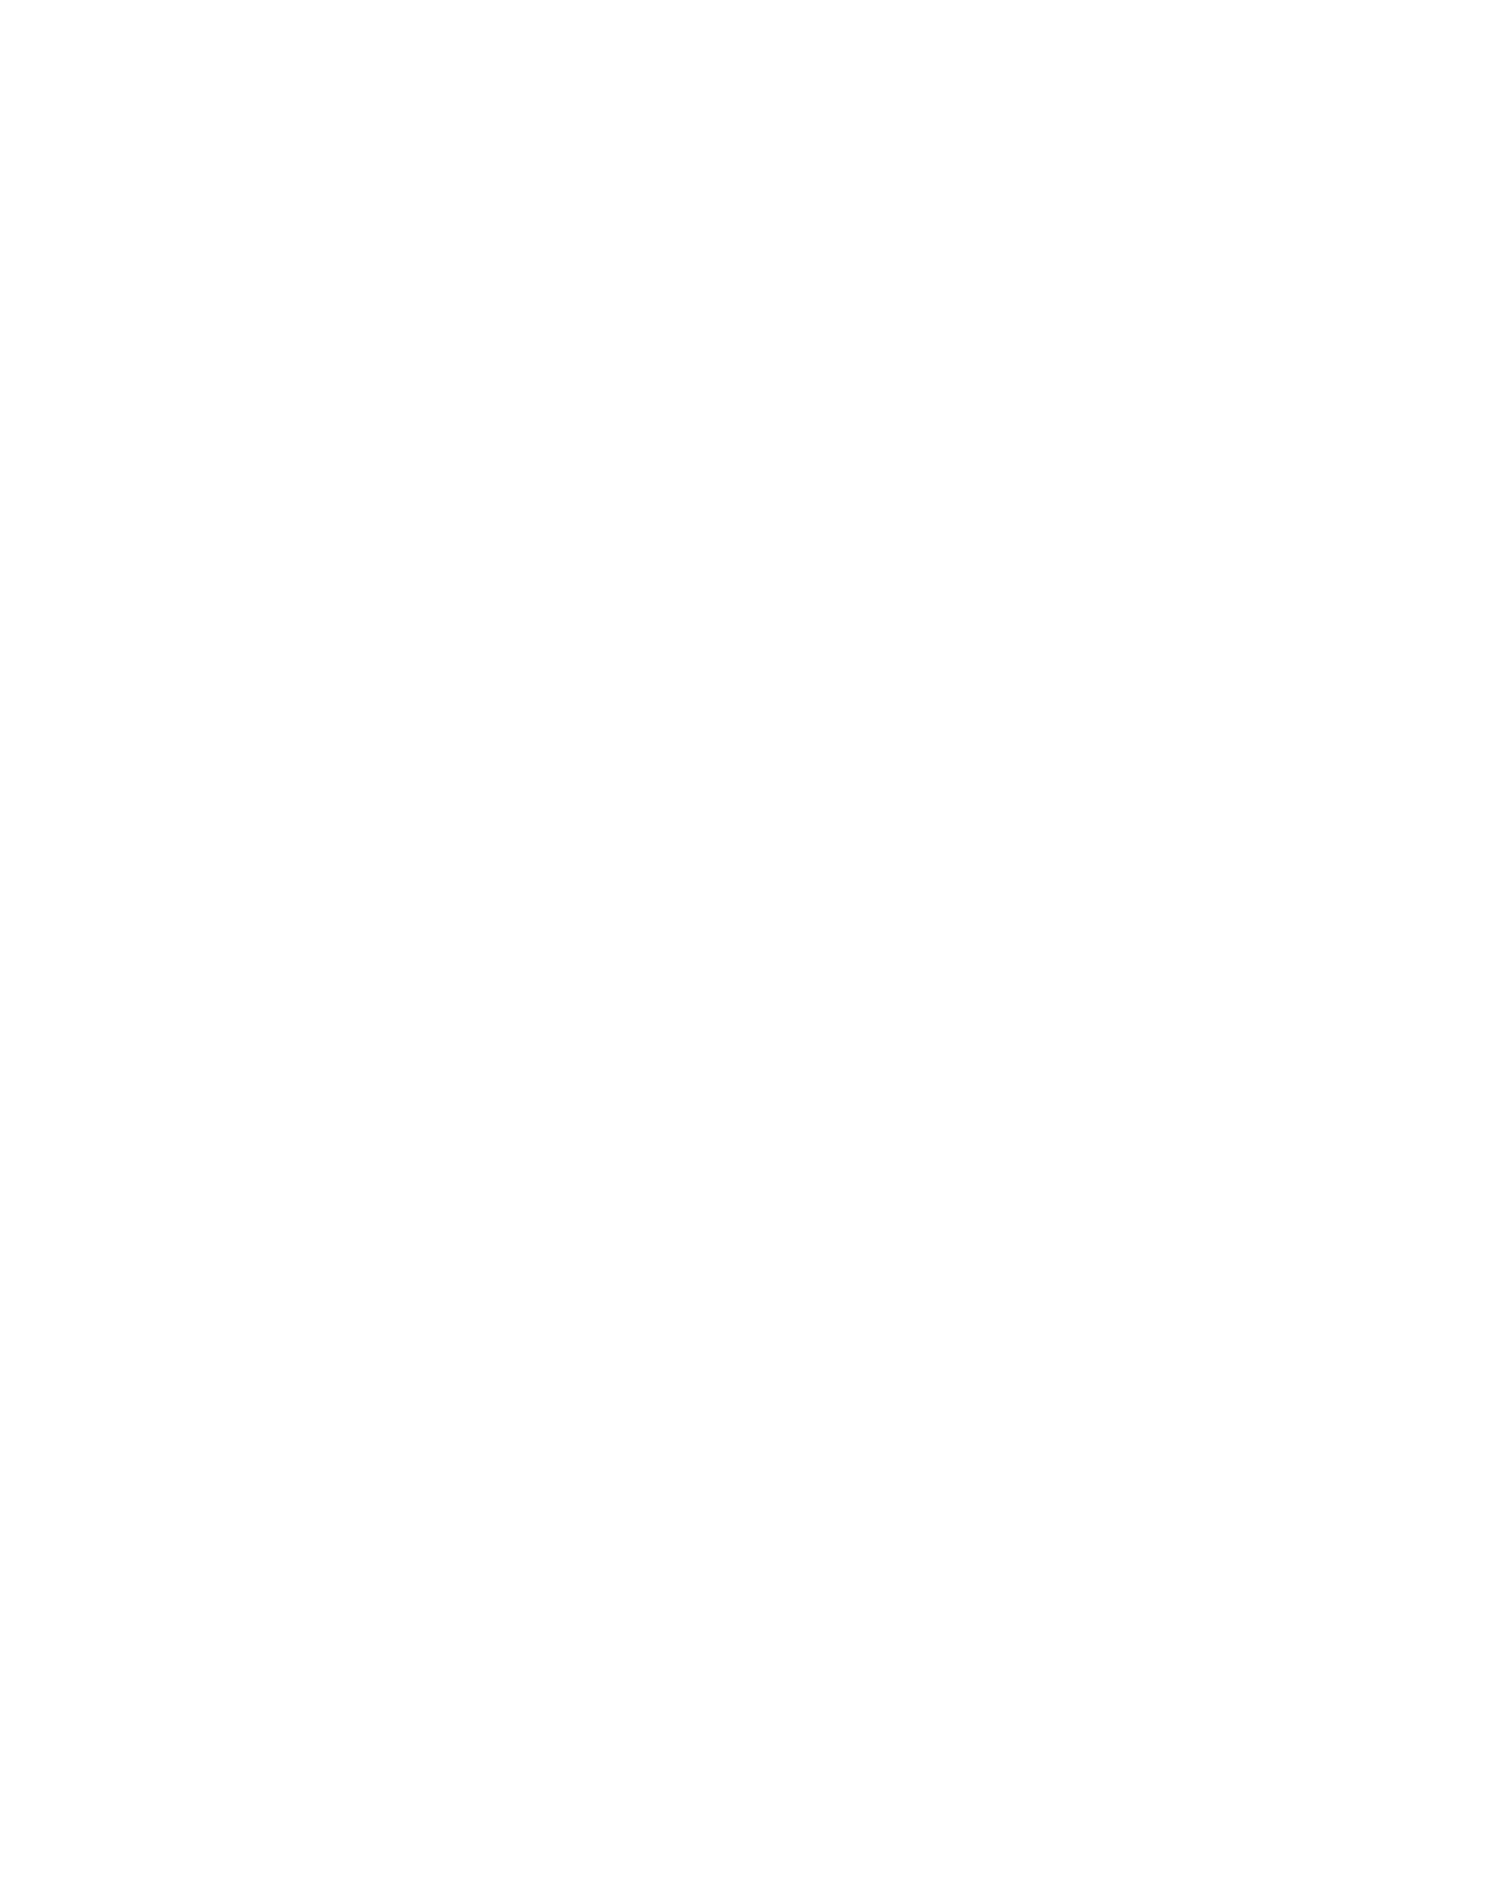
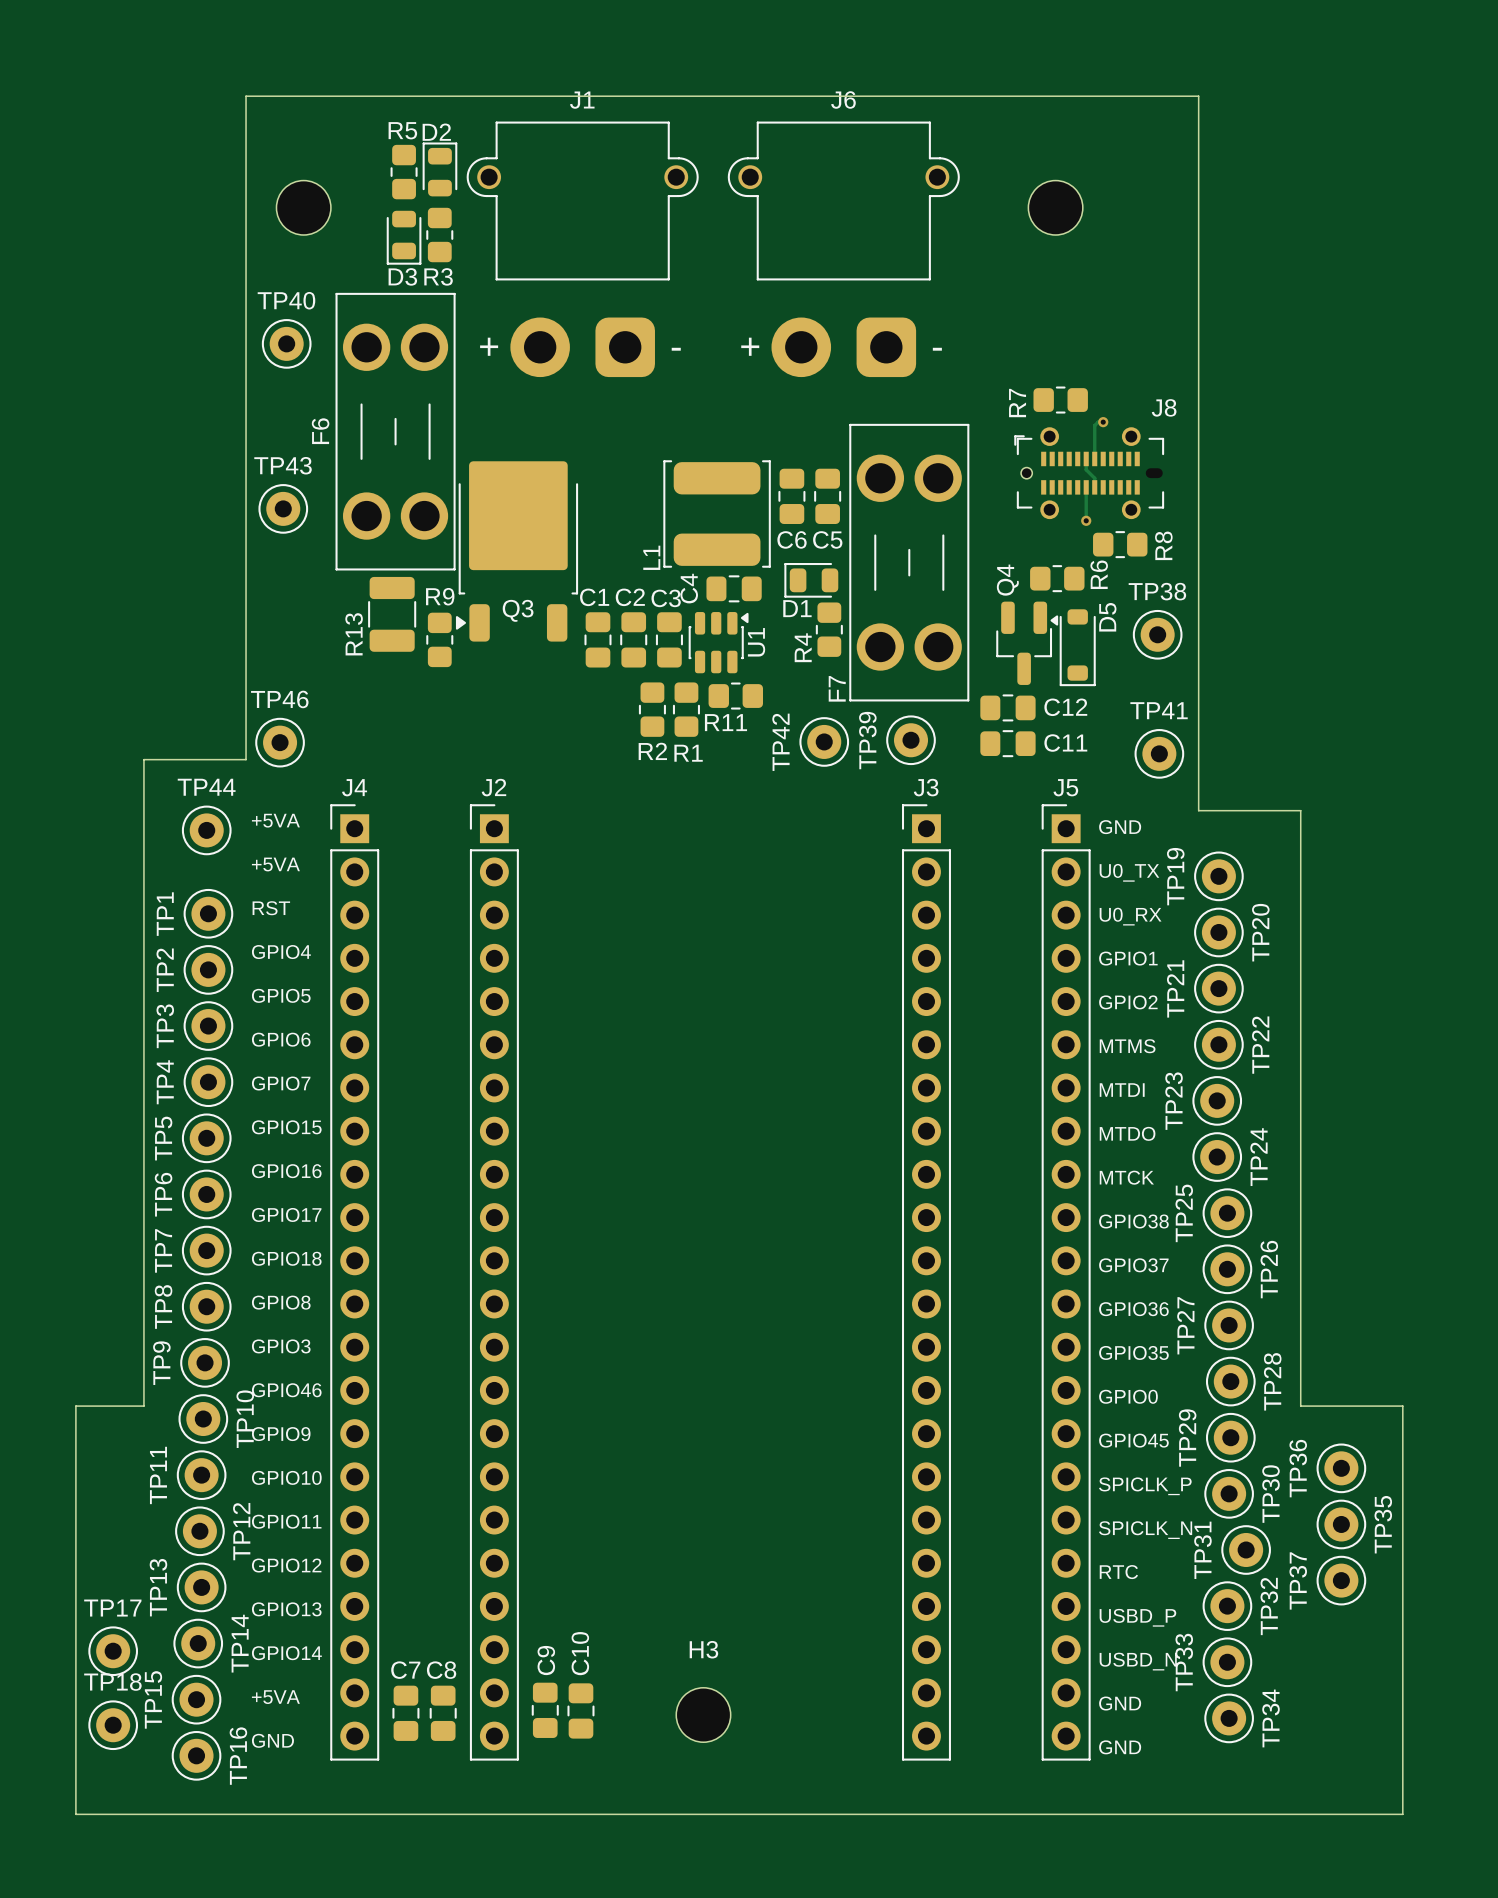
board edge: none -> (246, 96) (1198, 96) (1198, 810) (1300, 810) (1300, 1406) (1402, 1406) (1402, 1814) (75, 1814) (75, 1406) (143, 1406) (143, 759) (246, 759) (246, 96)
D2: none -> (439, 169)
R5: none -> (404, 172)
part: none -> (303, 207)
part: none -> (1055, 207)
R3: none -> (439, 235)
D3: none -> (404, 237)
J1: none -> (582, 249)
J6: none -> (843, 249)
TP40: none -> (286, 343)
R7: none -> (1060, 400)
track: none -> (1103, 422) (1098, 422) (1094, 425) (1094, 458)
via: none -> (1103, 422)
F6: none -> (395, 431)
track: none -> (1086, 458) (1086, 469) (1094, 478) (1094, 487)
J8: none -> (1089, 473)
track: none -> (1086, 487) (1086, 520)
C6: none -> (791, 496)
C5: none -> (827, 496)
TP43: none -> (283, 508)
L1: none -> (717, 514)
via: none -> (1086, 520)
R8: none -> (1120, 544)
Q3: none -> (517, 551)
F7: none -> (909, 562)
R6: none -> (1057, 578)
D1: none -> (811, 580)
C4: none -> (734, 588)
R13: none -> (392, 614)
R4: none -> (829, 629)
TP38: none -> (1157, 634)
R9: none -> (439, 639)
C1: none -> (597, 639)
C2: none -> (633, 639)
C3: none -> (669, 639)
U1: none -> (718, 642)
Q4: none -> (1027, 643)
D5: none -> (1077, 647)
R11: none -> (735, 696)
C12: none -> (1007, 707)
R2: none -> (652, 709)
R1: none -> (686, 709)
TP39: none -> (911, 740)
TP42: none -> (824, 741)
TP46: none -> (280, 742)
C11: none -> (1007, 743)
TP41: none -> (1159, 753)
text: none -> +5VA (275, 820)
text: none -> GND (1120, 827)
TP44: none -> (206, 830)
text: none -> +5VA (275, 864)
text: none -> U0_TX (1129, 872)
TP19: none -> (1218, 876)
text: none -> RST (271, 908)
TP1: none -> (208, 913)
text: none -> U0_RX (1130, 916)
TP20: none -> (1218, 932)
text: none -> GPIO4 (281, 952)
text: none -> GPIO1 (1128, 958)
TP2: none -> (208, 969)
TP21: none -> (1218, 988)
text: none -> GPIO5 (281, 995)
text: none -> GPIO2 (1128, 1002)
TP3: none -> (208, 1026)
text: none -> GPIO6 (281, 1039)
TP22: none -> (1218, 1044)
text: none -> MTMS (1127, 1046)
TP4: none -> (208, 1082)
text: none -> GPIO7 (281, 1083)
text: none -> MTDI (1122, 1090)
TP23: none -> (1217, 1100)
text: none -> GPIO15 (286, 1127)
text: none -> MTDO (1127, 1133)
TP5: none -> (206, 1138)
TP24: none -> (1217, 1157)
text: none -> GPIO16 (286, 1171)
text: none -> MTCK (1126, 1177)
TP6: none -> (206, 1194)
TP25: none -> (1227, 1213)
text: none -> GPIO17 (286, 1214)
text: none -> GPIO38 (1133, 1221)
TP7: none -> (206, 1250)
text: none -> GPIO18 (286, 1258)
text: none -> GPIO37 (1133, 1265)
TP26: none -> (1227, 1269)
J4: none -> (354, 1282)
J2: none -> (494, 1282)
J3: none -> (926, 1282)
J5: none -> (1066, 1282)
text: none -> GPIO8 (281, 1302)
TP8: none -> (206, 1306)
text: none -> GPIO36 (1133, 1309)
TP27: none -> (1229, 1325)
text: none -> GPIO3 (281, 1346)
text: none -> GPIO35 (1133, 1352)
TP9: none -> (205, 1362)
TP28: none -> (1230, 1381)
text: none -> GPIO46 (286, 1390)
text: none -> GPIO0 (1128, 1396)
TP10: none -> (203, 1419)
text: none -> GPIO9 (281, 1434)
TP29: none -> (1230, 1437)
text: none -> GPIO45 (1133, 1440)
TP36: none -> (1341, 1468)
TP11: none -> (201, 1475)
text: none -> GPIO10 (286, 1477)
text: none -> SPICLK_P (1145, 1486)
TP30: none -> (1229, 1493)
text: none -> GPIO11 (286, 1521)
TP35: none -> (1341, 1524)
text: none -> SPICLK_N (1145, 1530)
TP12: none -> (199, 1531)
TP31: none -> (1246, 1549)
text: none -> GPIO12 (286, 1565)
text: none -> RTC (1118, 1572)
TP37: none -> (1341, 1580)
TP13: none -> (201, 1587)
TP32: none -> (1227, 1606)
text: none -> GPIO13 (286, 1609)
text: none -> USBD_P (1137, 1617)
TP14: none -> (198, 1643)
TP17: none -> (113, 1651)
text: none -> GPIO14 (286, 1653)
text: none -> USBD_N (1138, 1661)
TP33: none -> (1227, 1662)
text: none -> +5VA (275, 1697)
TP15: none -> (196, 1699)
text: none -> GND (1120, 1703)
C9: none -> (545, 1710)
C10: none -> (580, 1710)
C7: none -> (405, 1713)
C8: none -> (443, 1713)
H3: none -> (703, 1715)
TP34: none -> (1229, 1718)
TP18: none -> (113, 1725)
text: none -> GND (272, 1740)
text: none -> GND (1120, 1747)
TP16: none -> (196, 1755)

